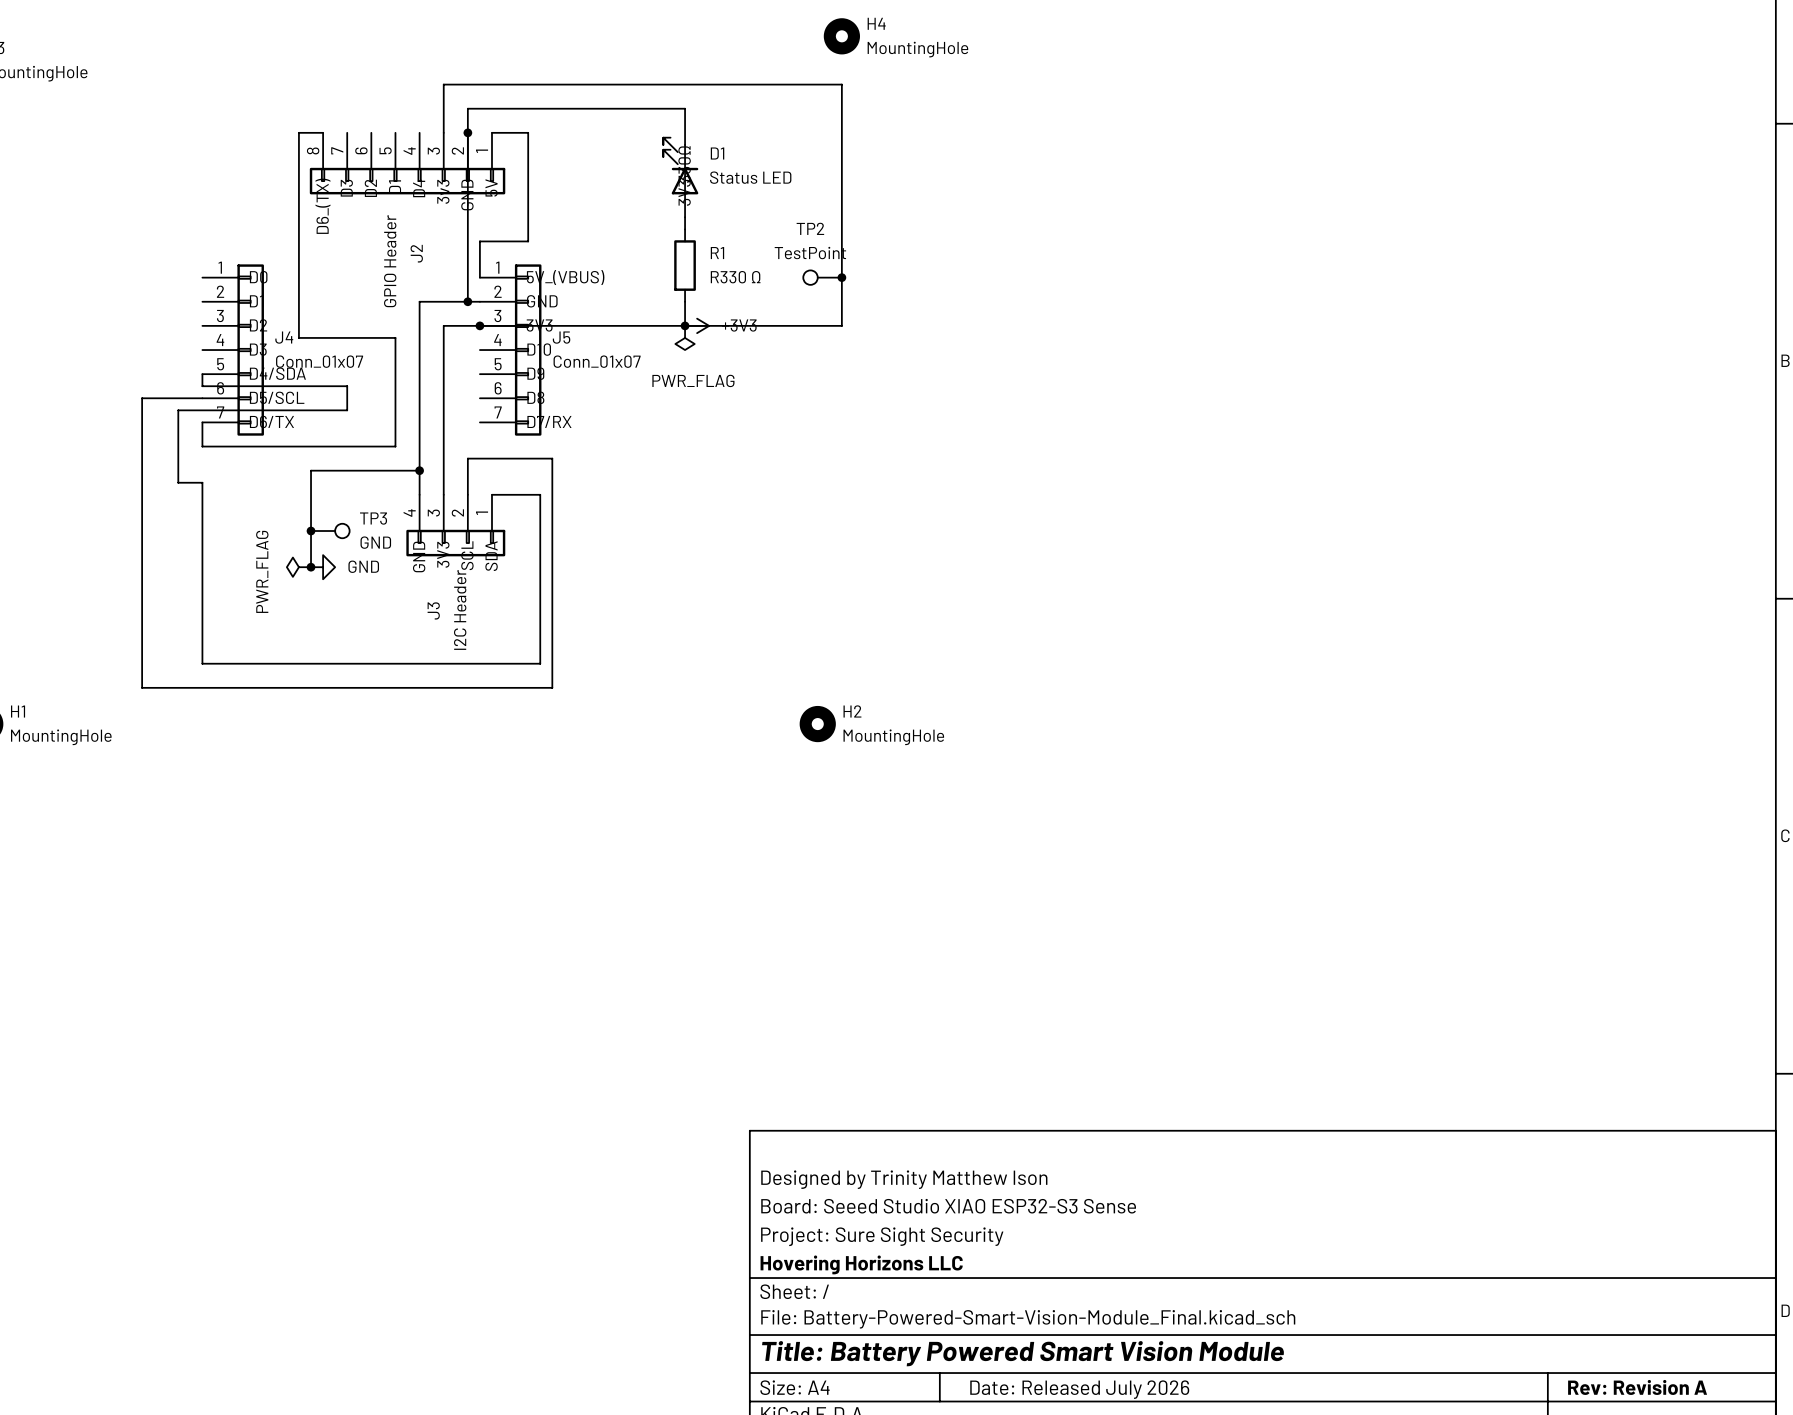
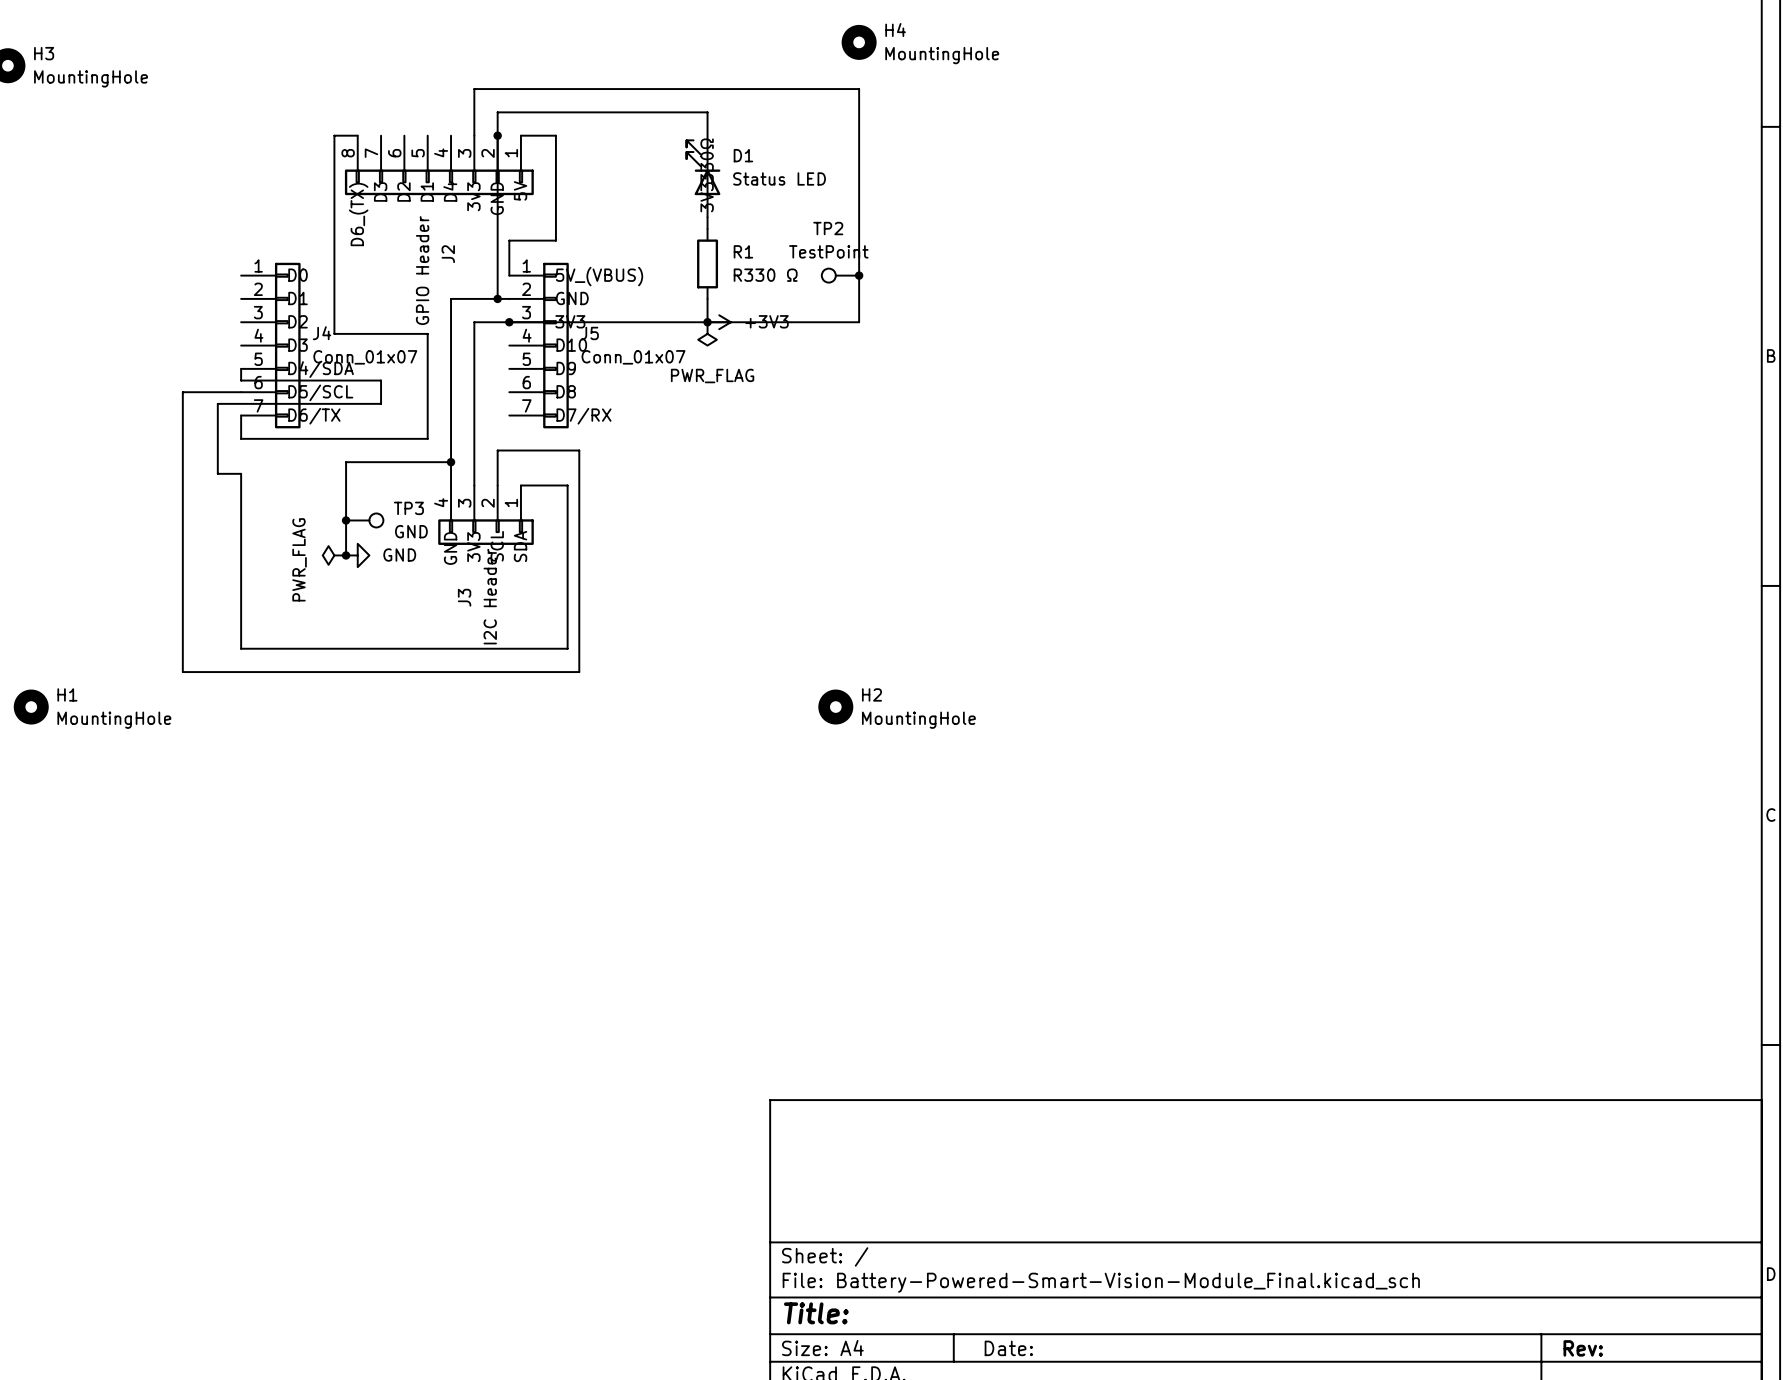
title block: Designed by Trinity Matthew Ison (904, 1179) -> none
title block: Board: Seeed Studio XIAO ESP32-S3 Sense (948, 1206) -> none
title block: Project: Sure Sight Security (882, 1236) -> none
title block: Hovering Horizons LLC (861, 1264) -> none
title block: Title: Battery Powered Smart Vision Module (1022, 1353) -> Title: (816, 1313)
title block: Rev: Revision A (1637, 1387) -> Rev: (1583, 1348)
title block: Date: Released July 2026 (1079, 1389) -> Date: (1008, 1348)

